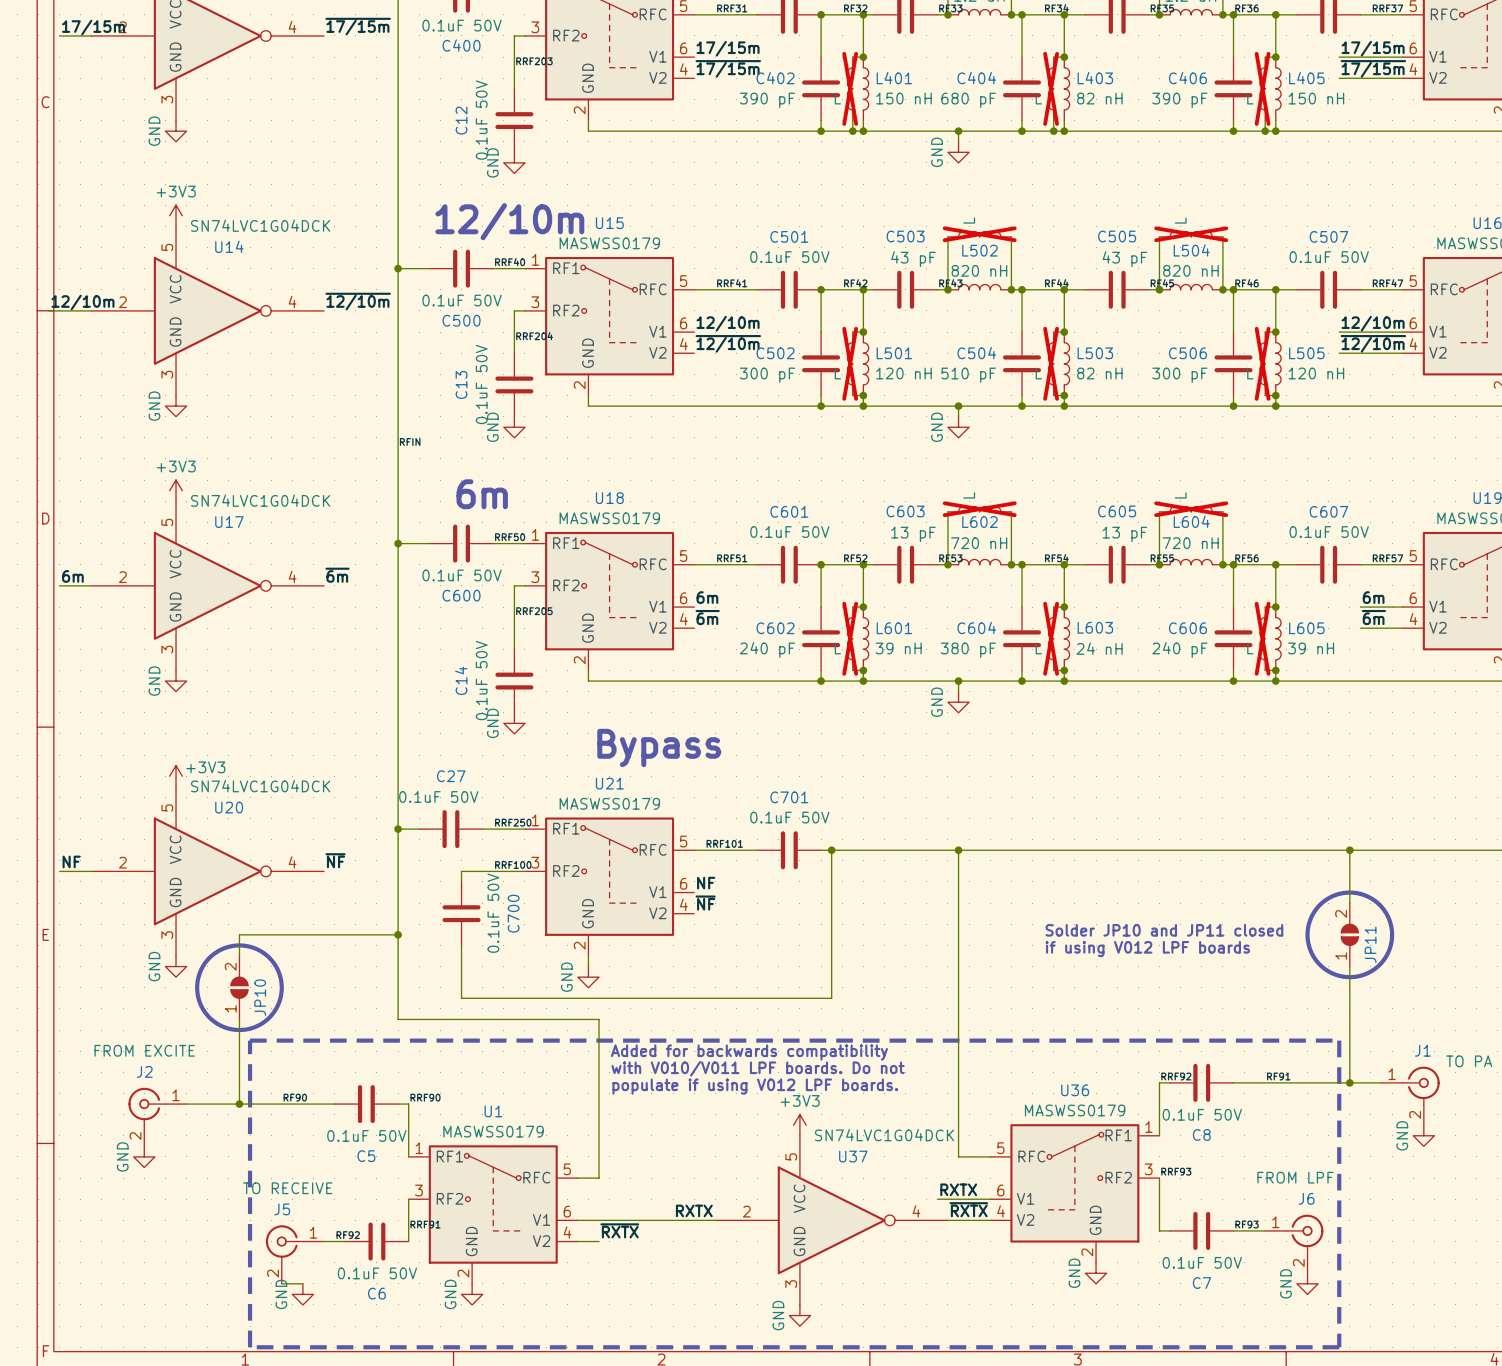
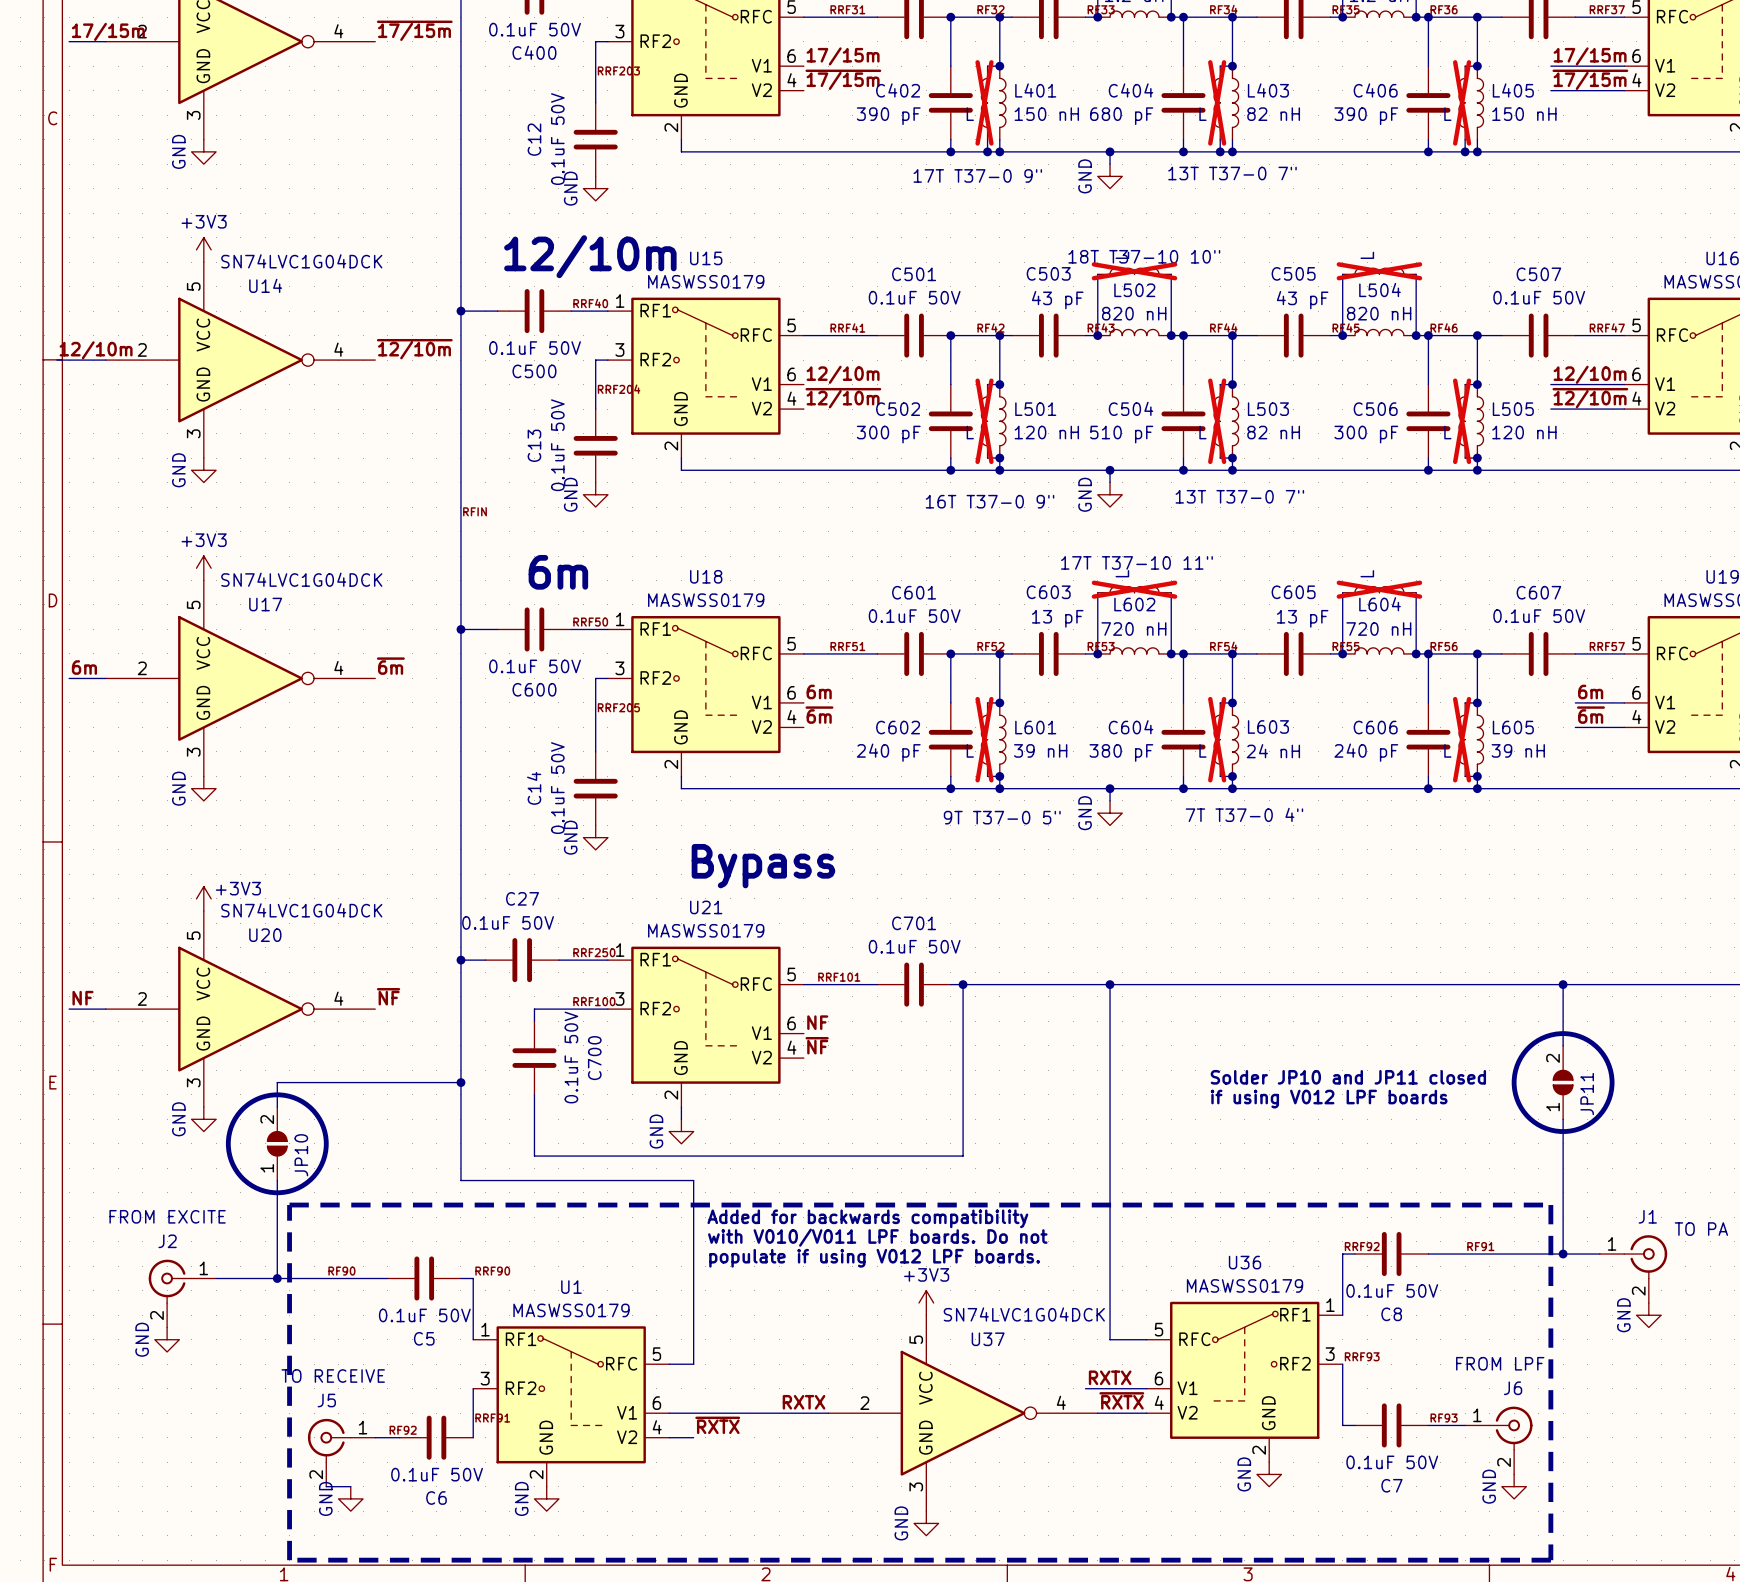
text: none -> 13T T37-0 7" (1232, 173)
text: none -> 17T T37-0 9" (977, 175)
text: none -> 18T T37-10 10" (1144, 256)
text: none -> 13T T37-0 7" (1239, 496)
text: none -> 16T T37-0 9" (990, 501)
text: none -> 17T T37-10 11" (1136, 562)
text: none -> 7T T37-0 4" (1244, 814)
text: none -> 9T T37-0 5" (1002, 817)

